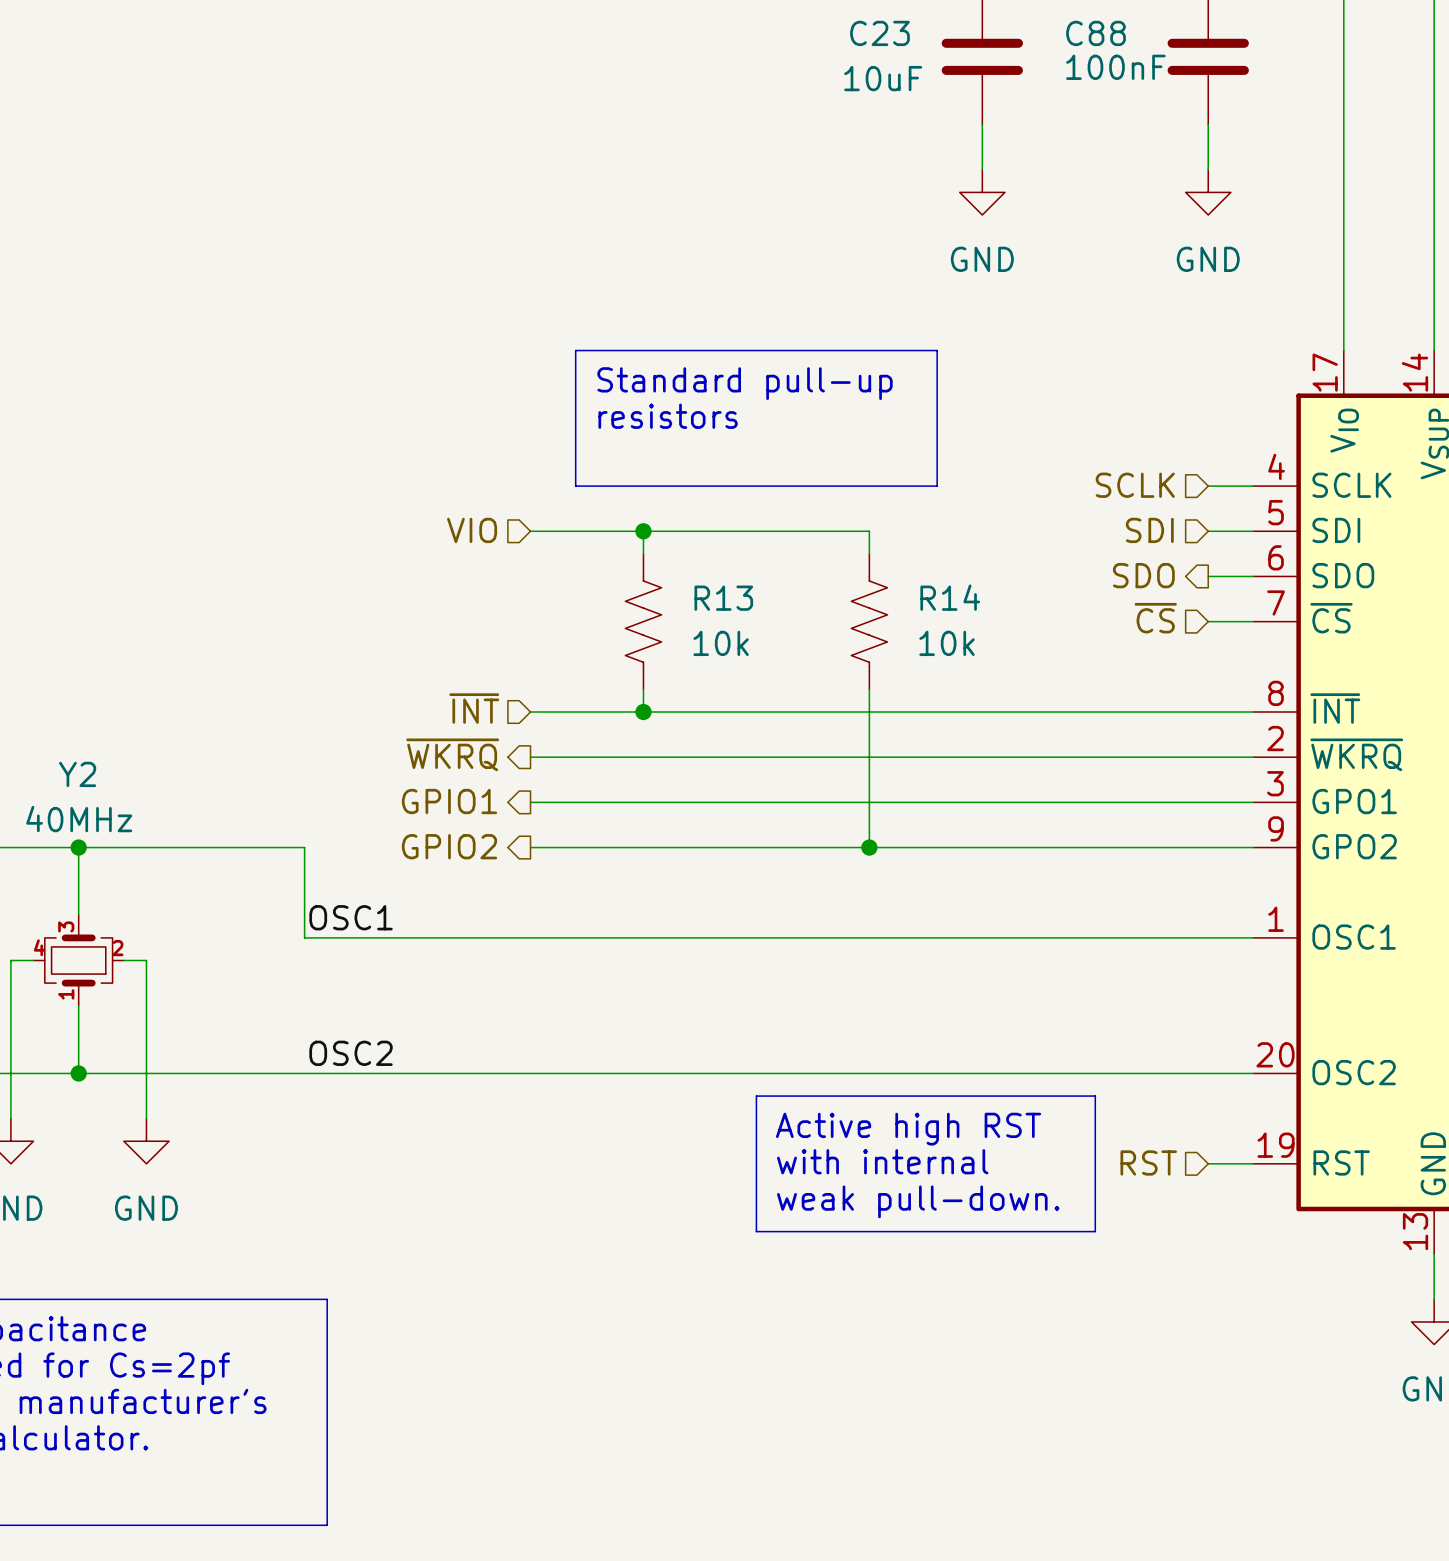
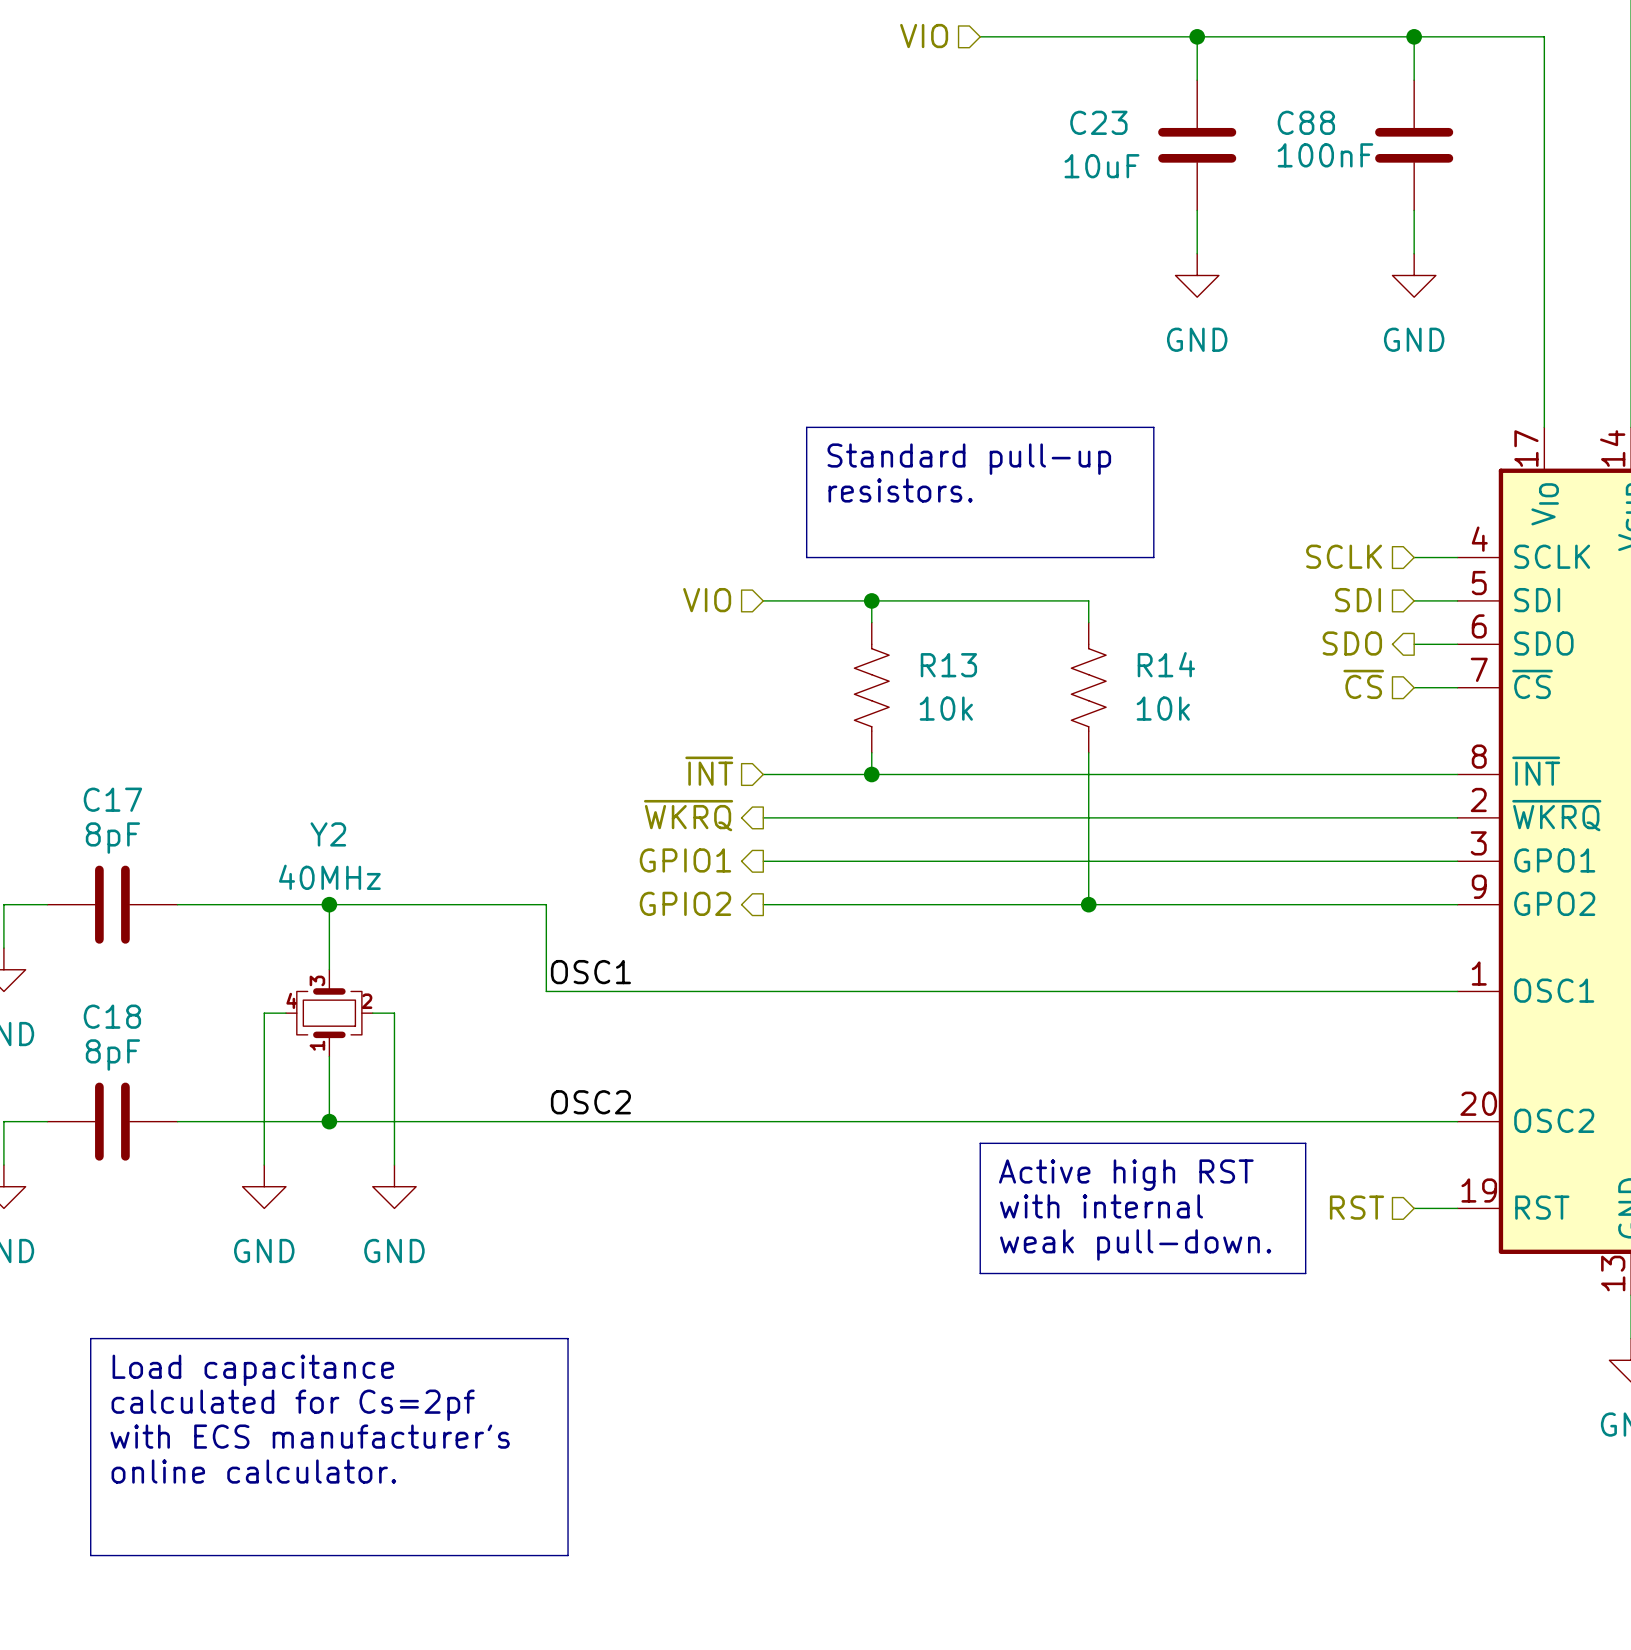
text: resistors (668, 416) -> resistors. (900, 490)

